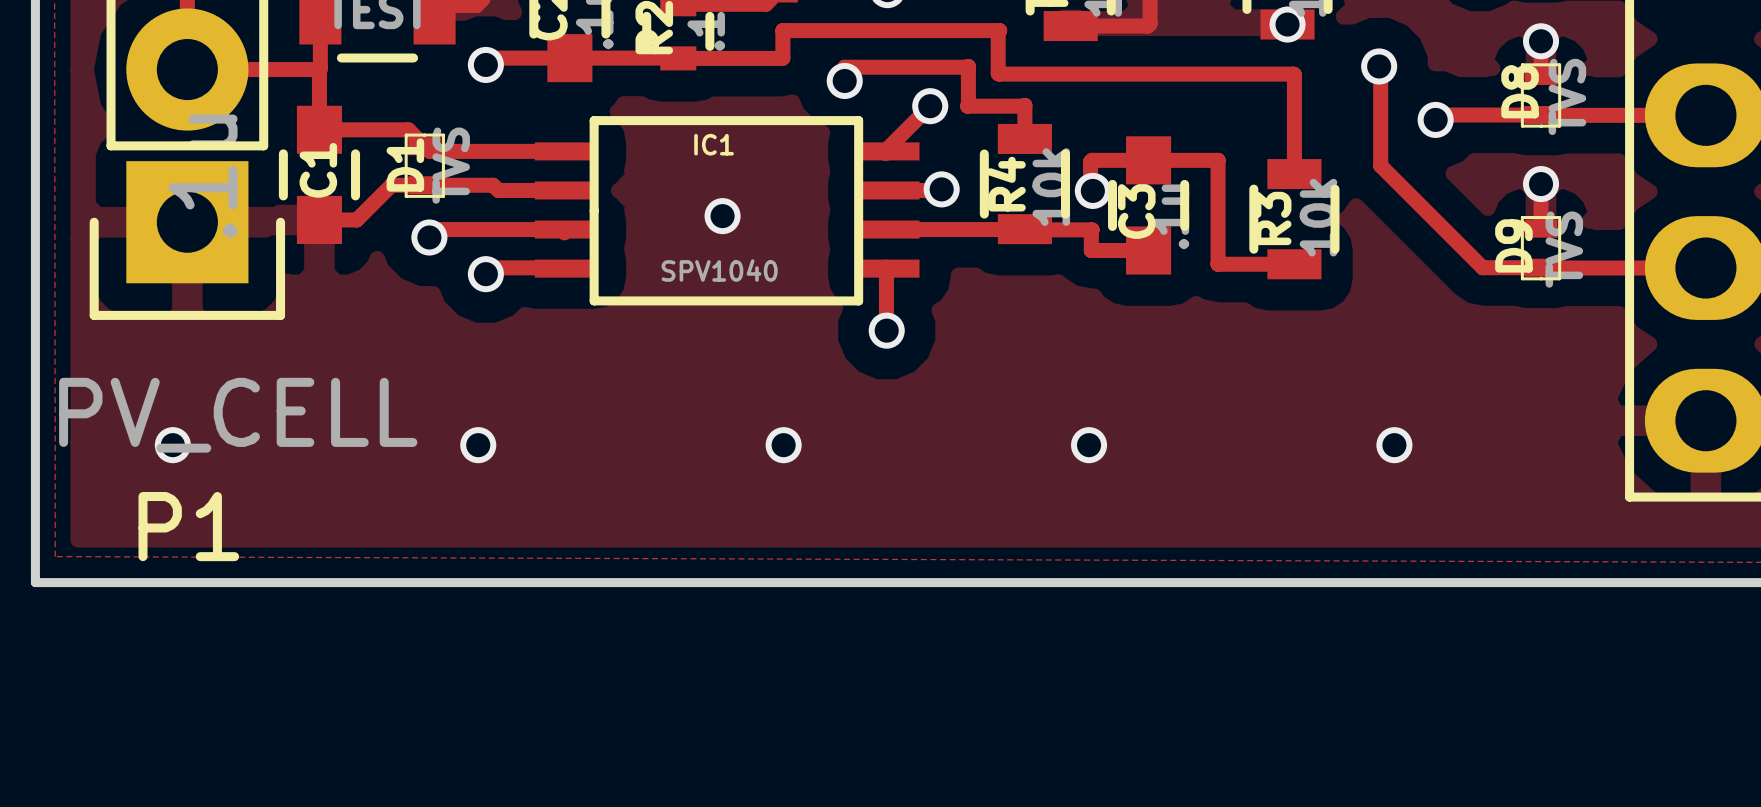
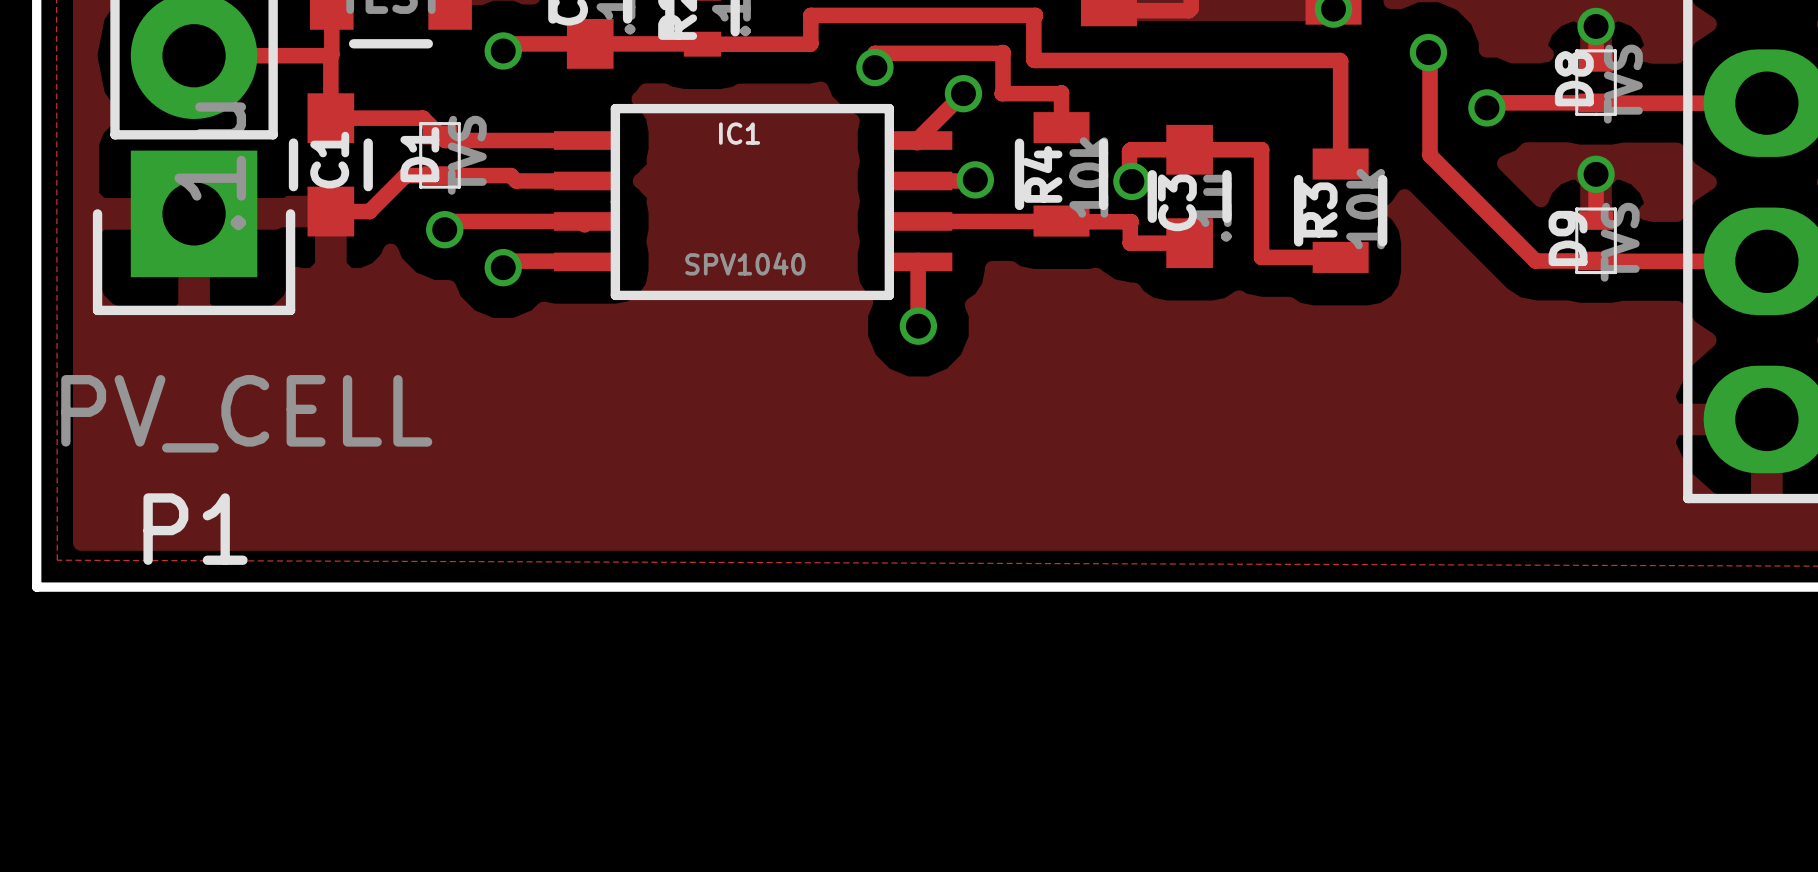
via: (722, 216) -> none
via: (172, 445) -> none
via: (478, 445) -> none
via: (783, 445) -> none
via: (1089, 445) -> none
via: (1394, 445) -> none

